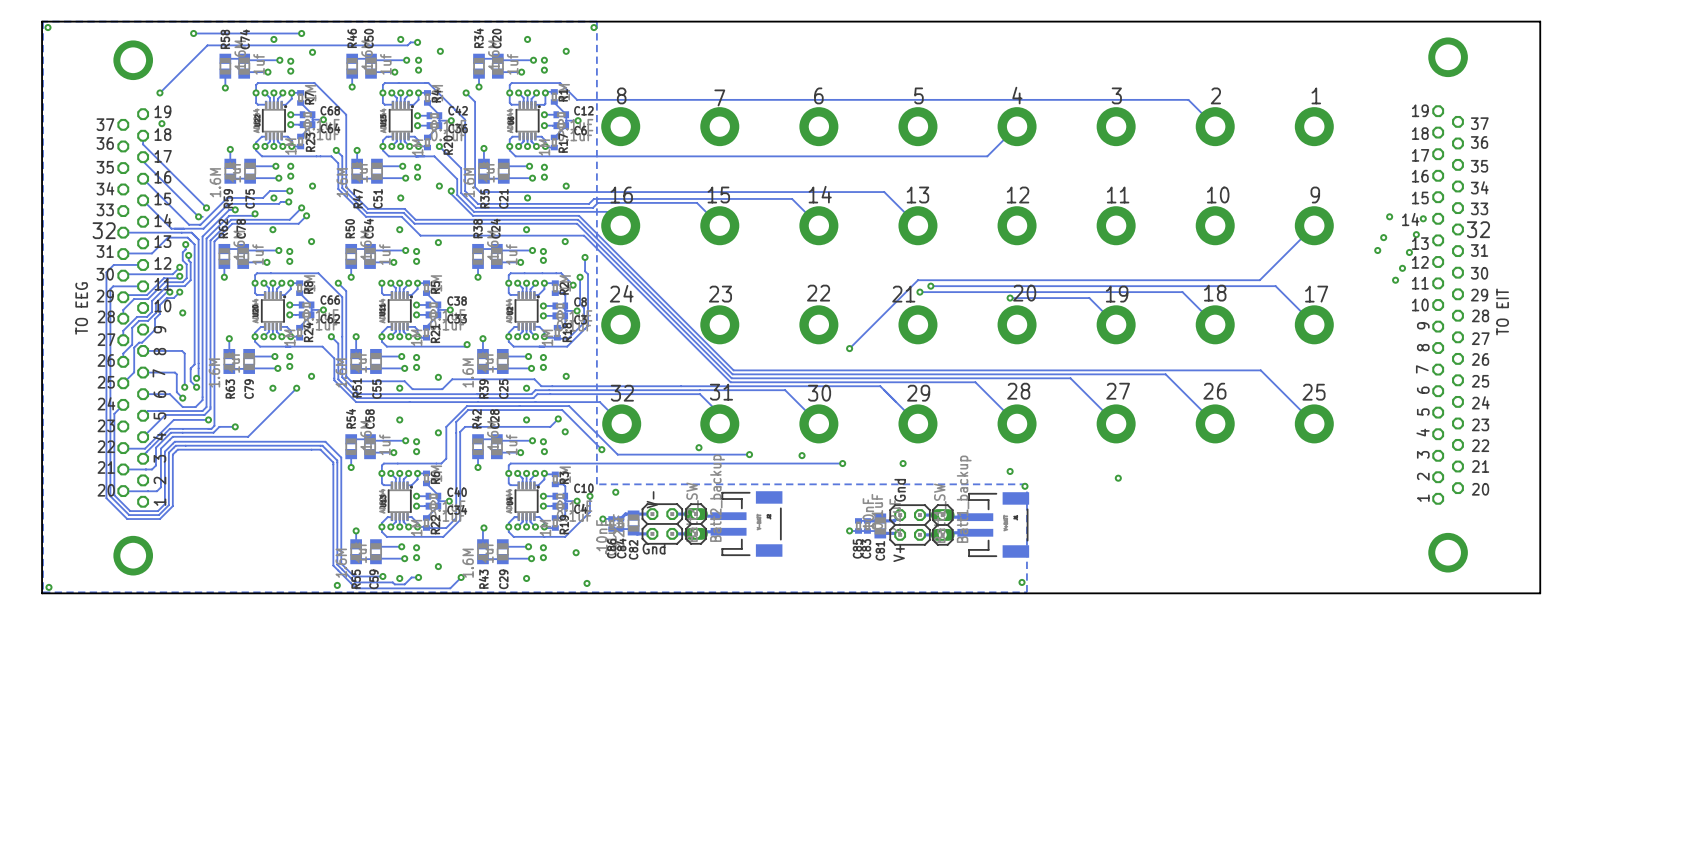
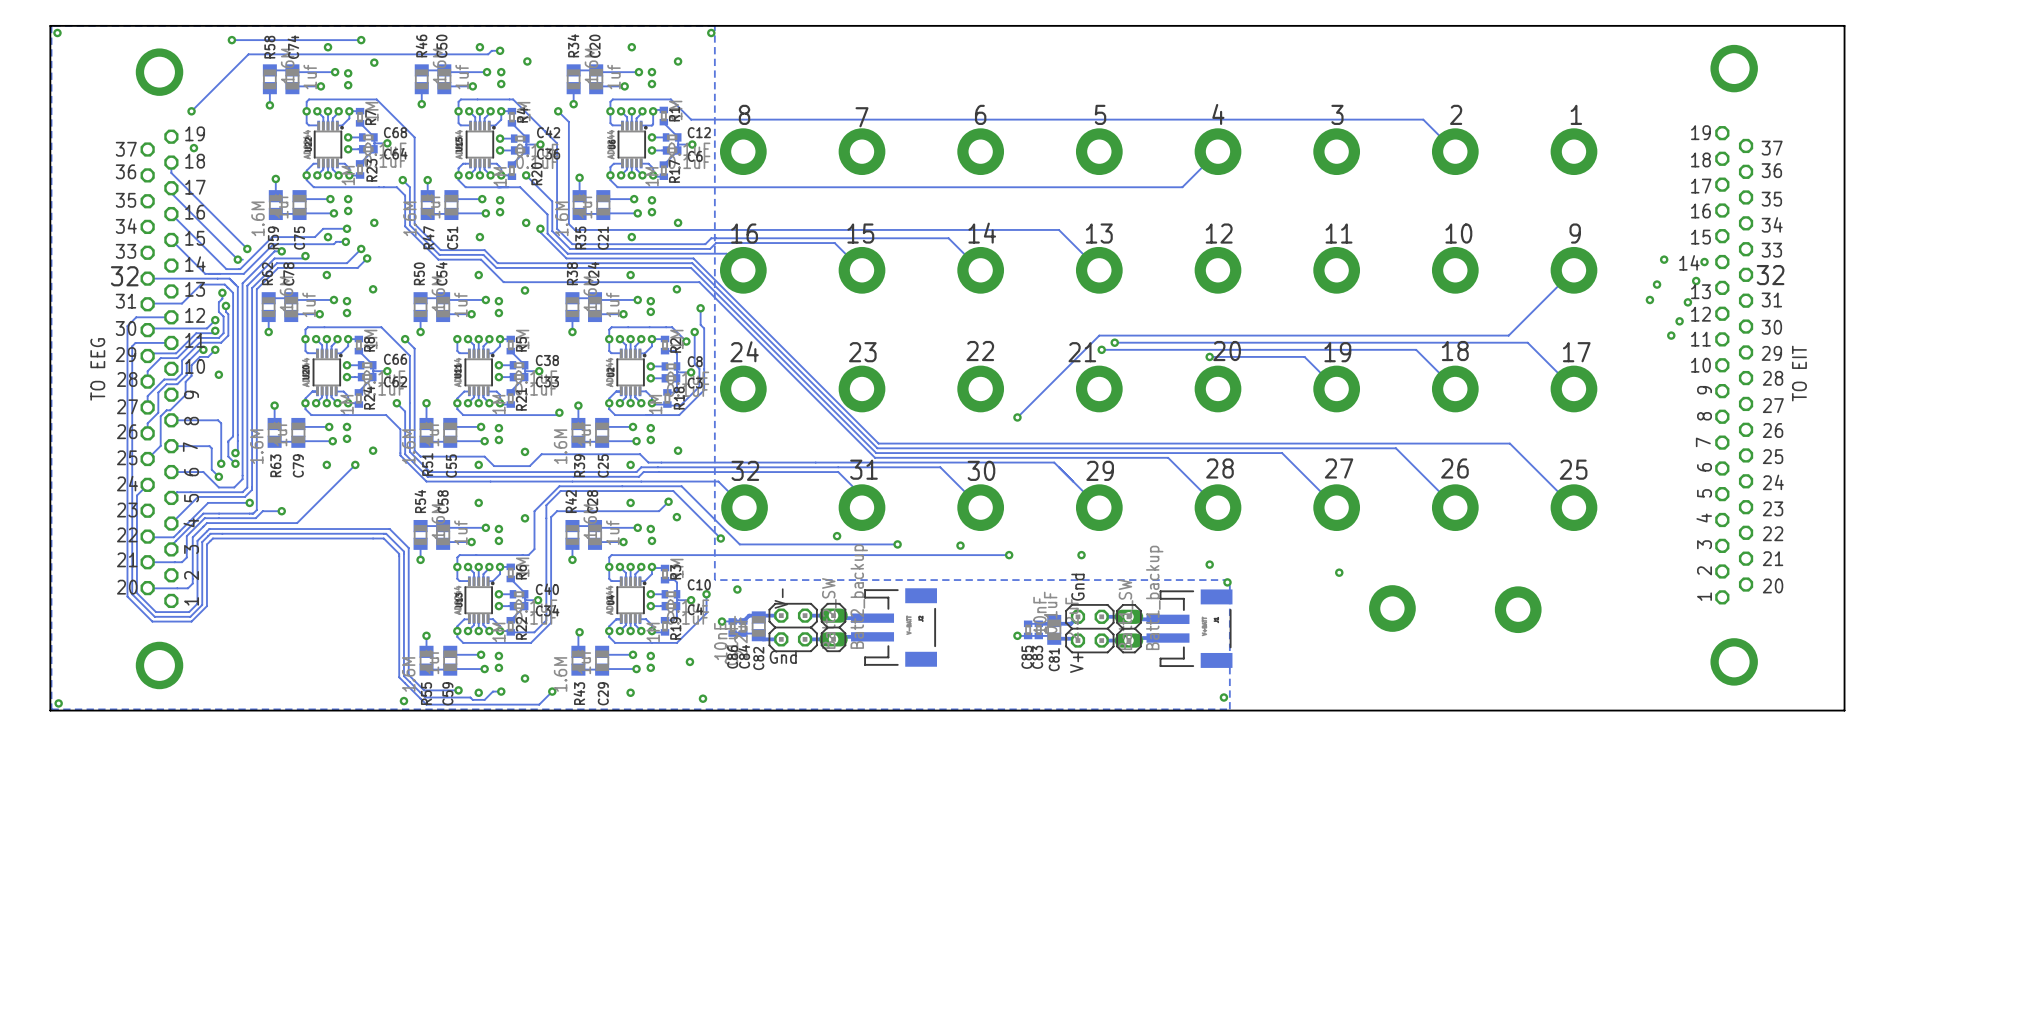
part: none -> (1392, 608)
part: none -> (1518, 609)

